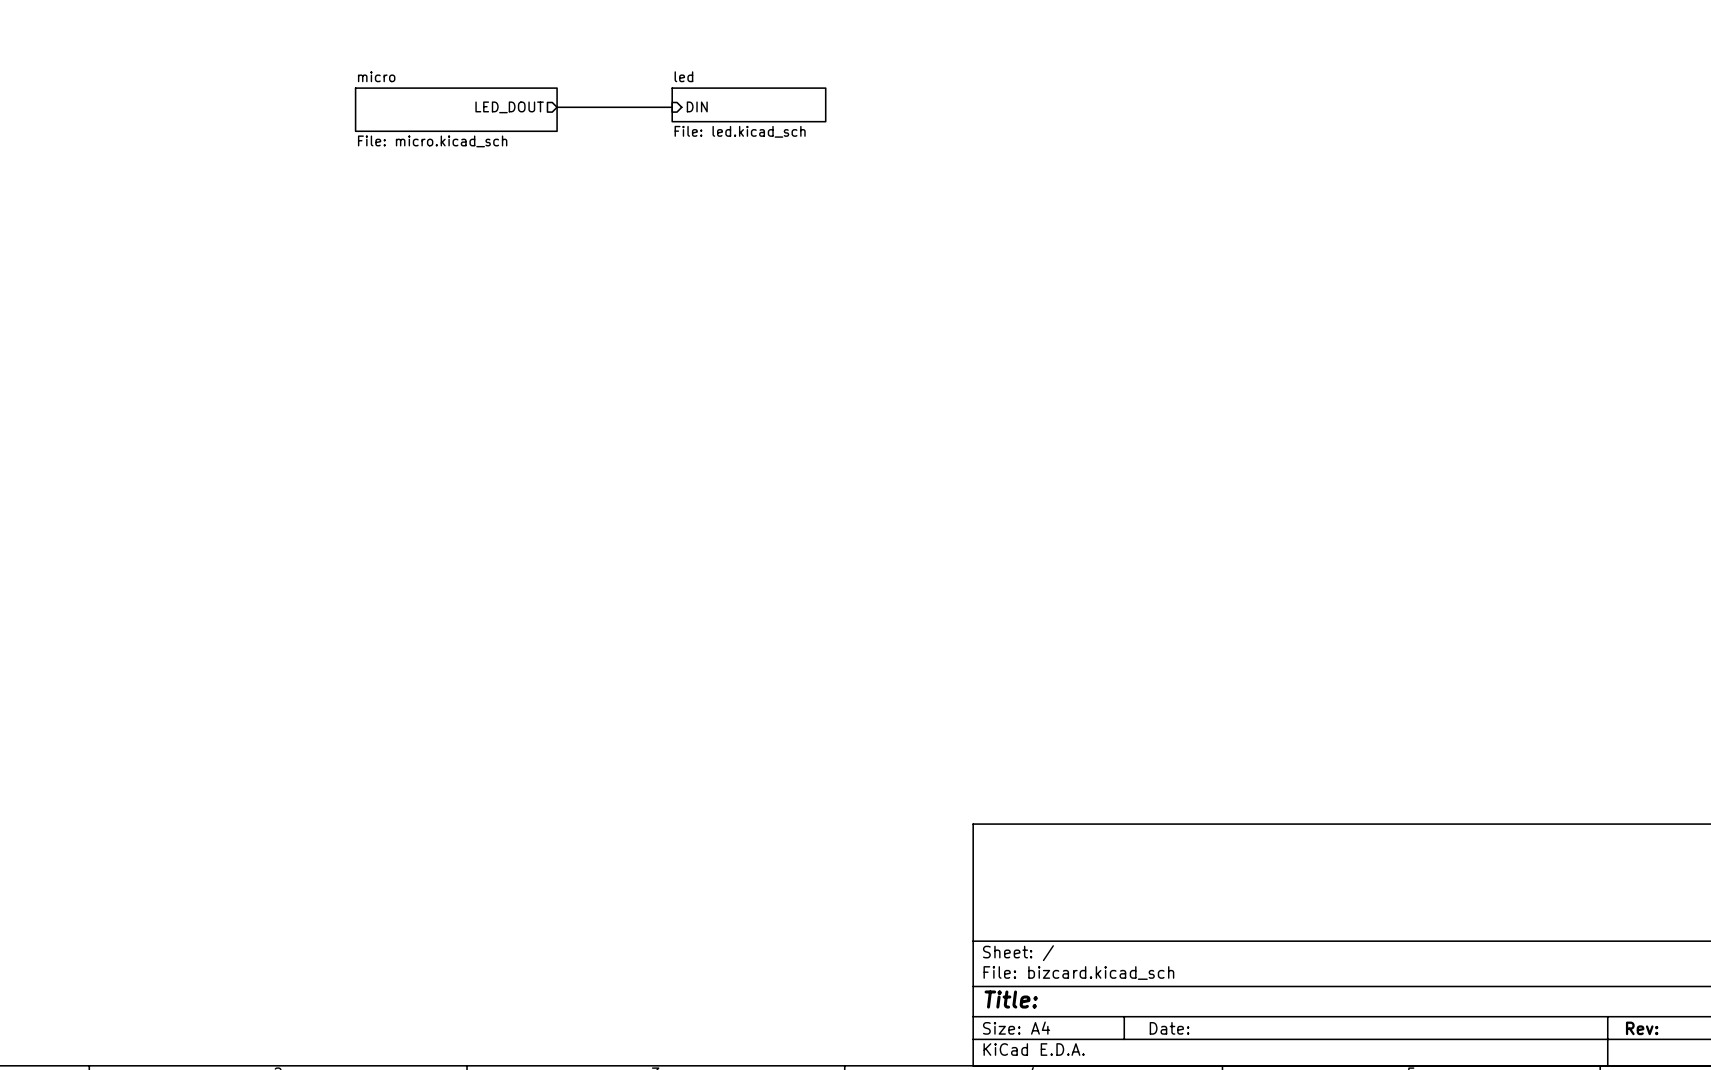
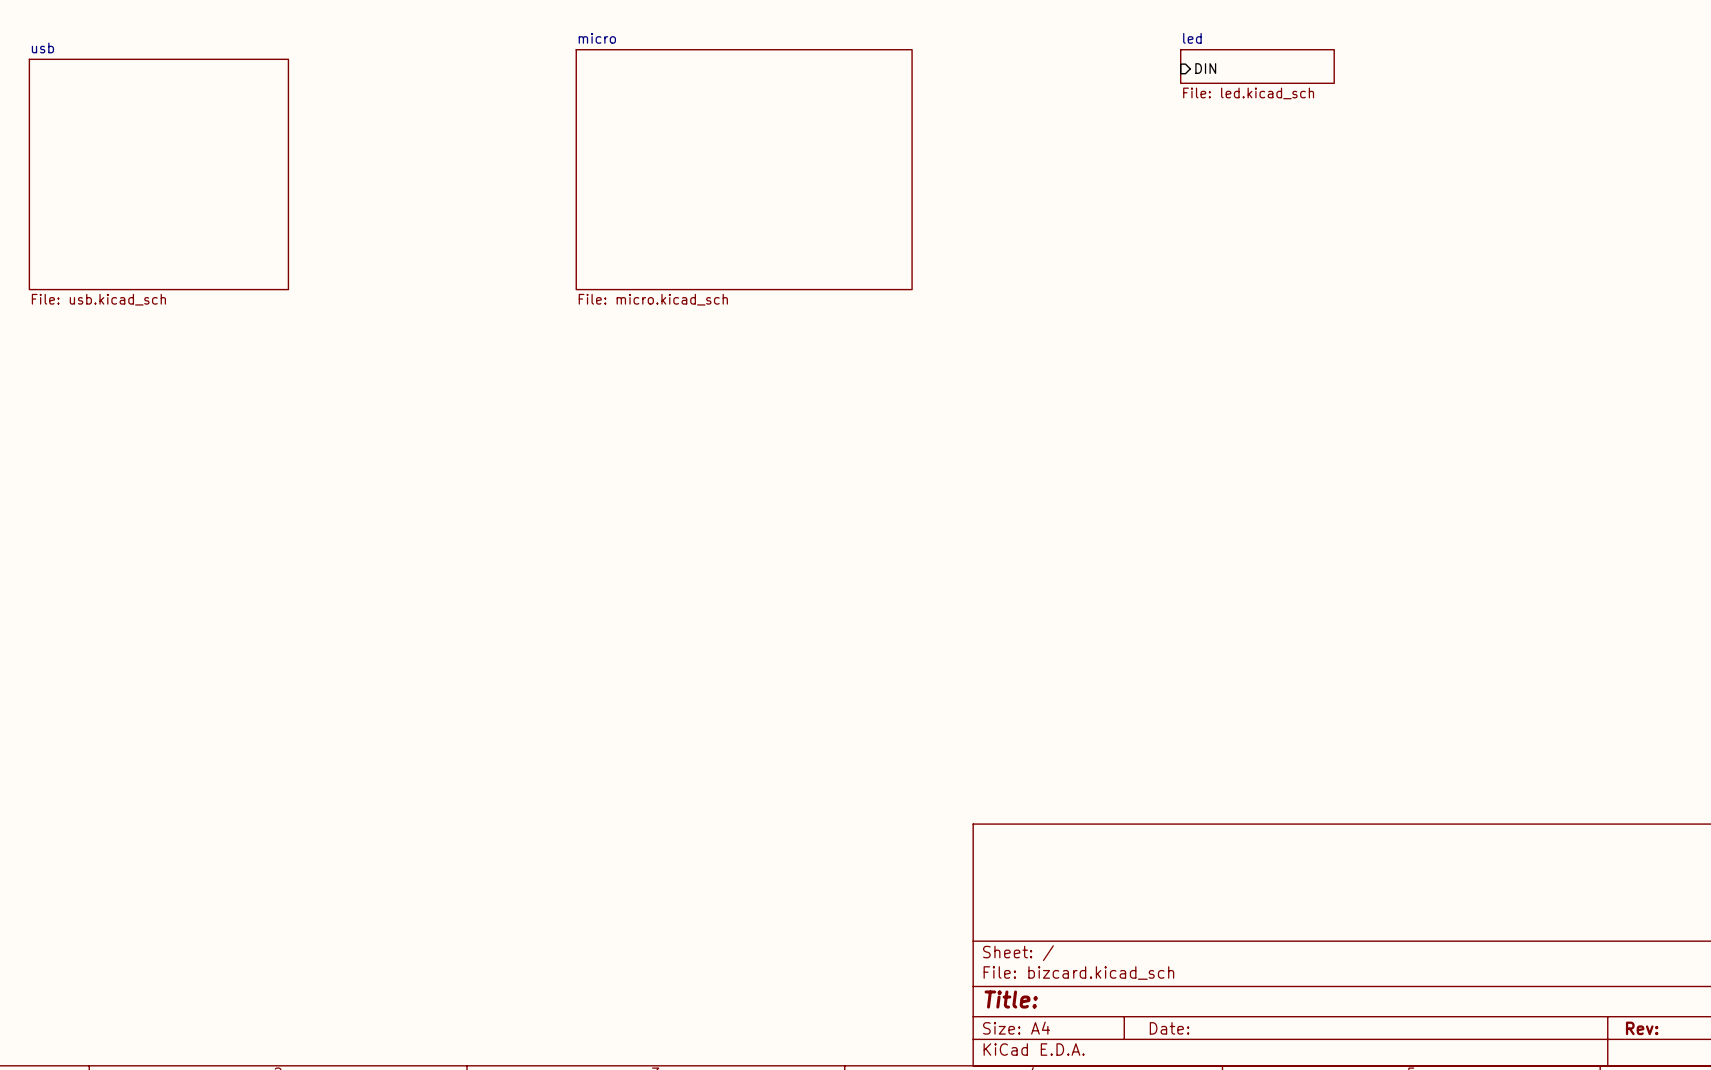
sheet led: none -> File: led.kicad_sch (1257, 66)
sheet pin: none -> DIN (1205, 68)
sheet led: File: led.kicad_sch (748, 104) -> none
sheet pin: DIN (697, 106) -> none
sheet pin: LED_DOUT (509, 107) -> none
wire: (557, 107) (672, 107) -> none
sheet micro: File: micro.kicad_sch (456, 109) -> none
sheet micro: none -> File: micro.kicad_sch (744, 169)
sheet usb: none -> File: usb.kicad_sch (158, 174)

